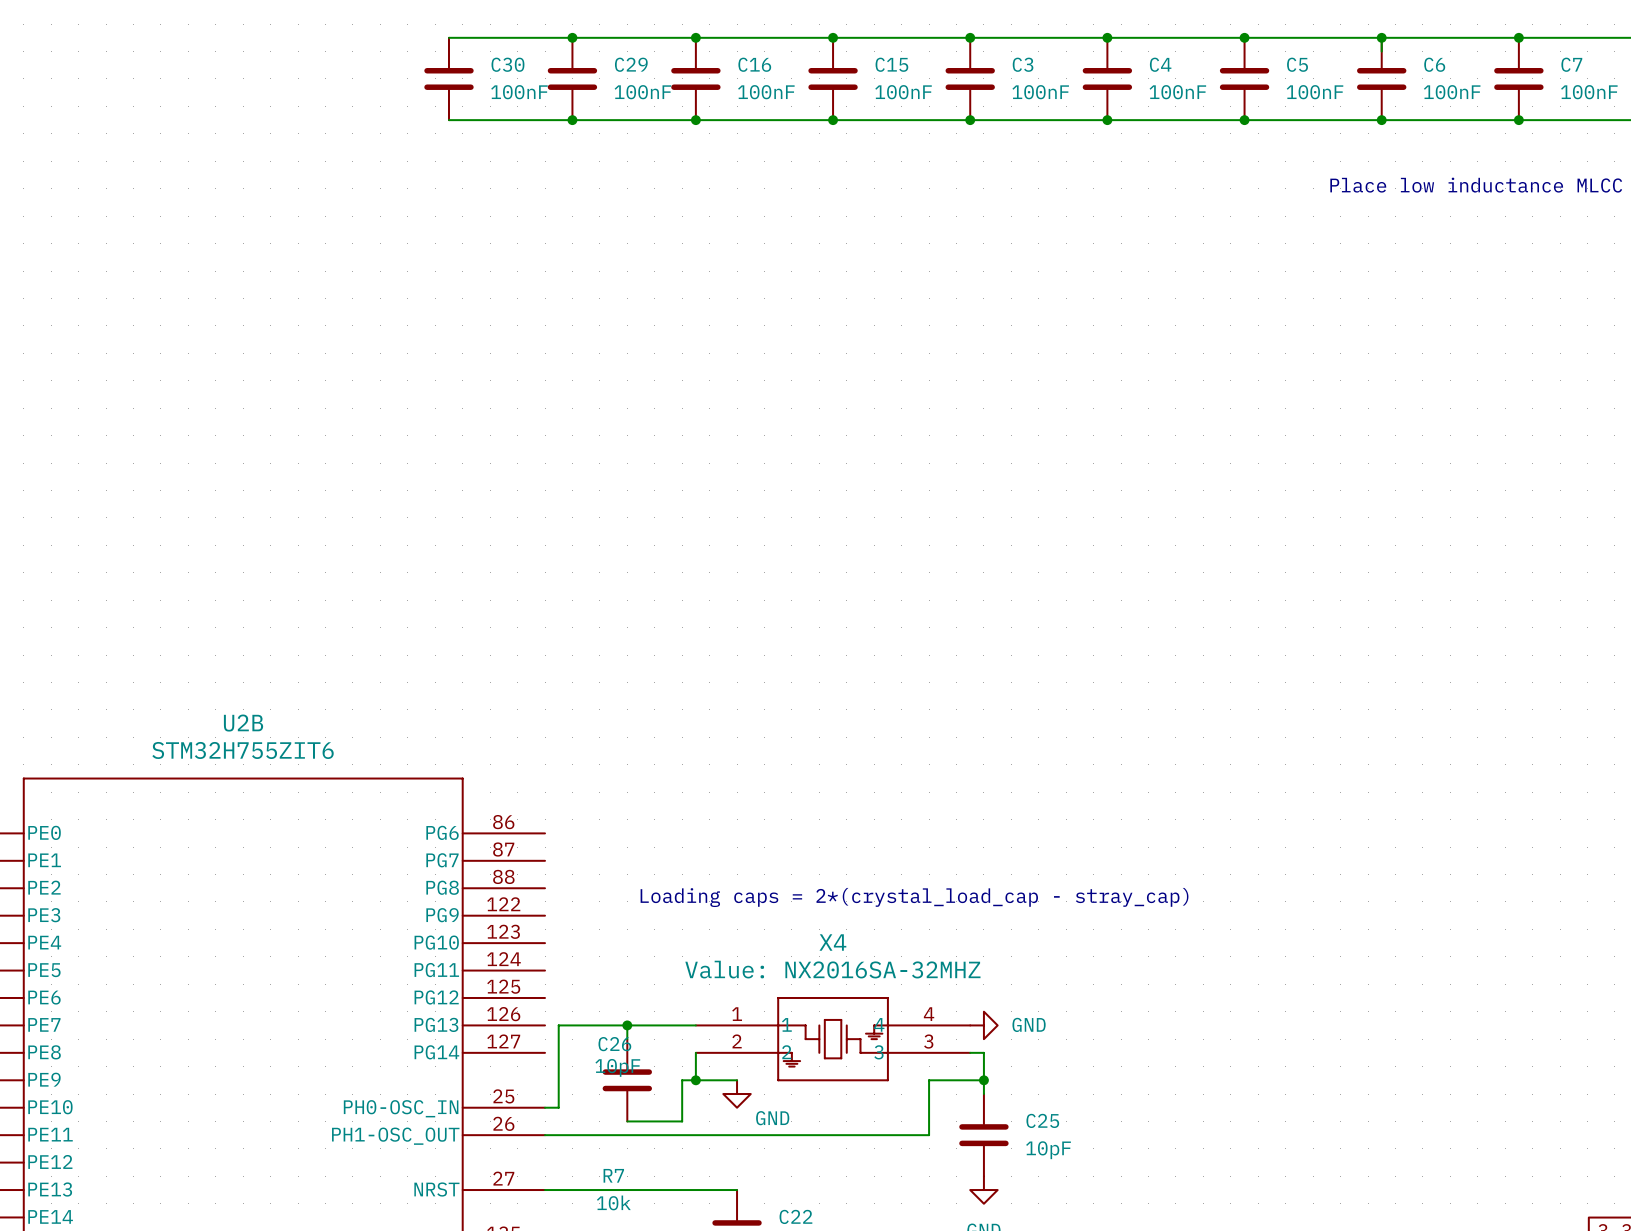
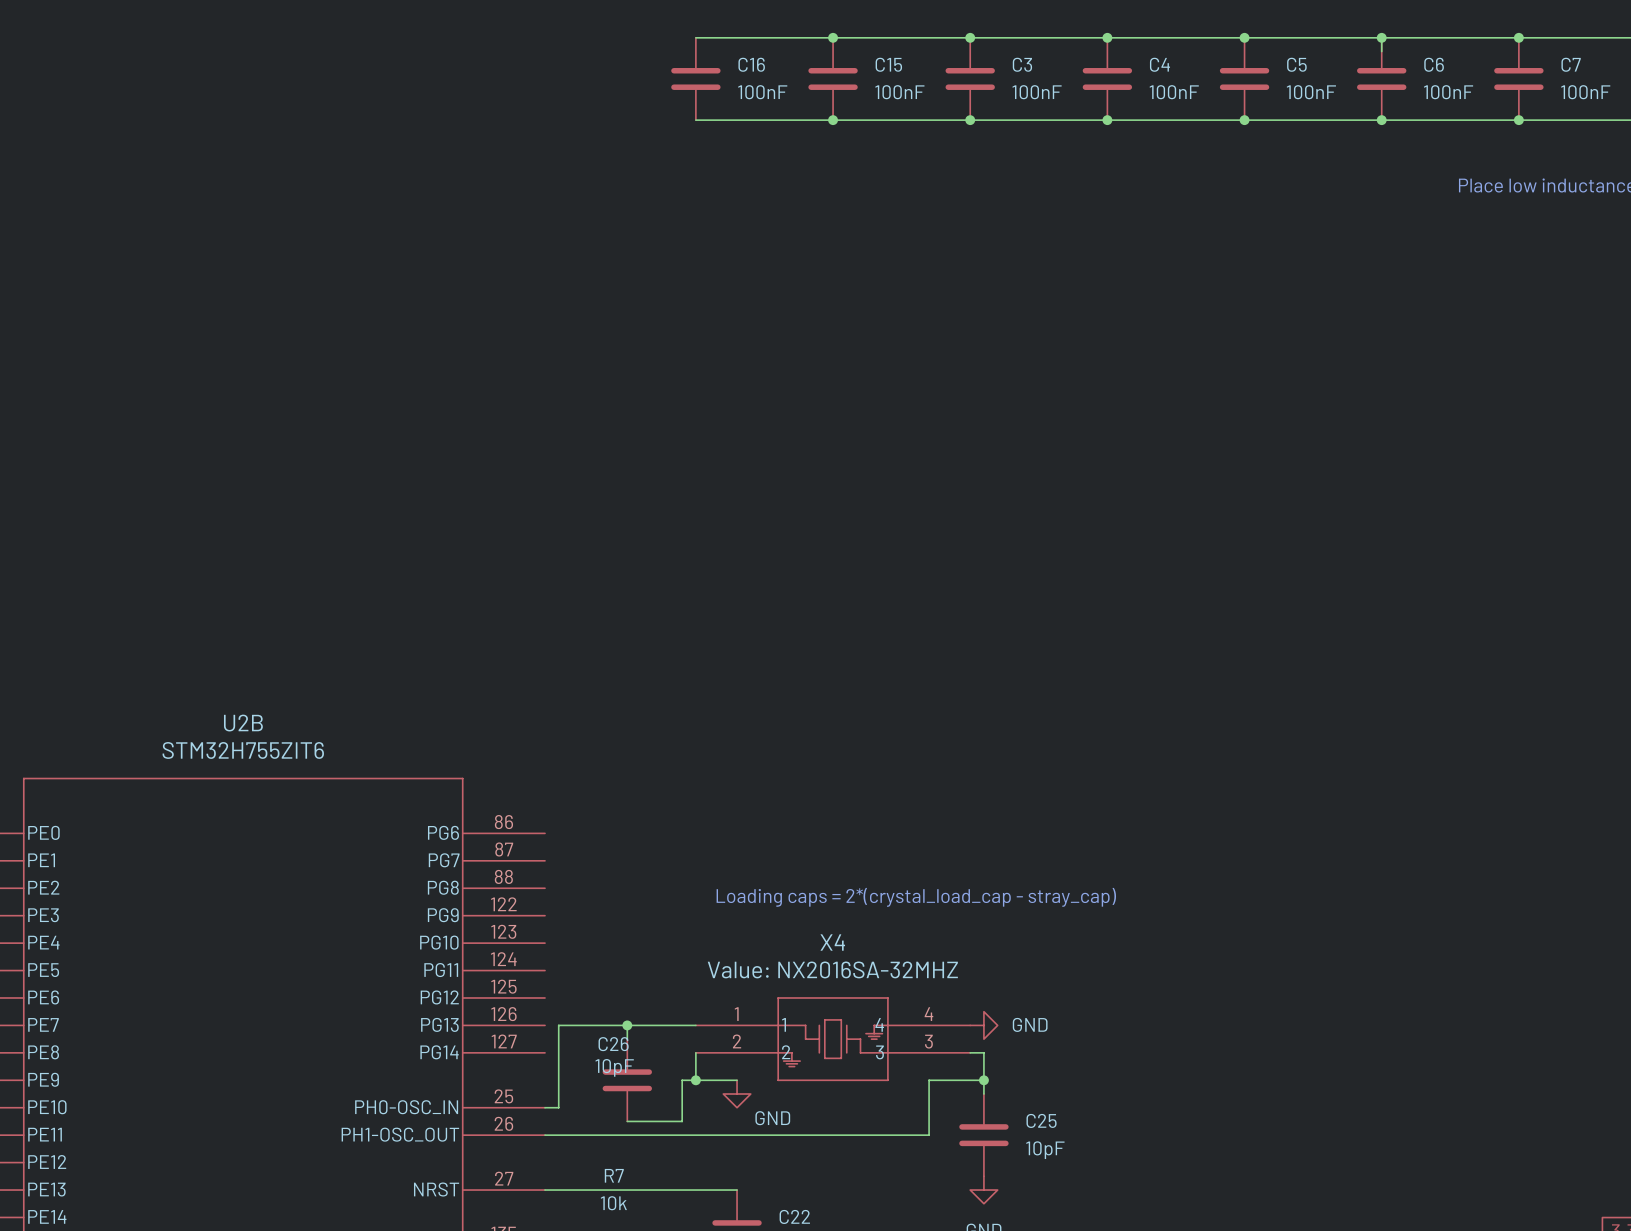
wire: (448, 37) (695, 37) -> none
junction: (572, 37) -> none
junction: (695, 37) -> none
C30: 100nF (448, 78) -> none
C29: 100nF (572, 78) -> none
wire: (448, 120) (695, 120) -> none
junction: (572, 120) -> none
junction: (695, 120) -> none

